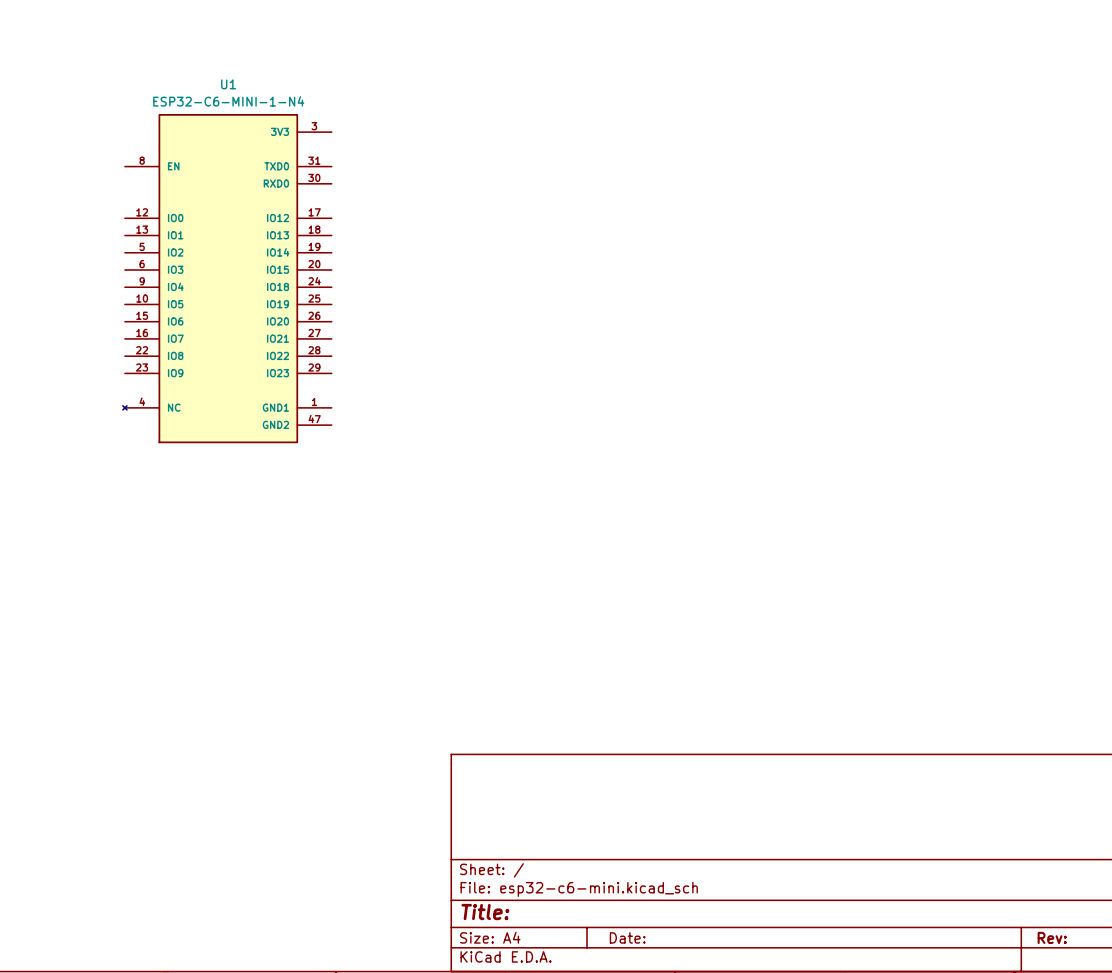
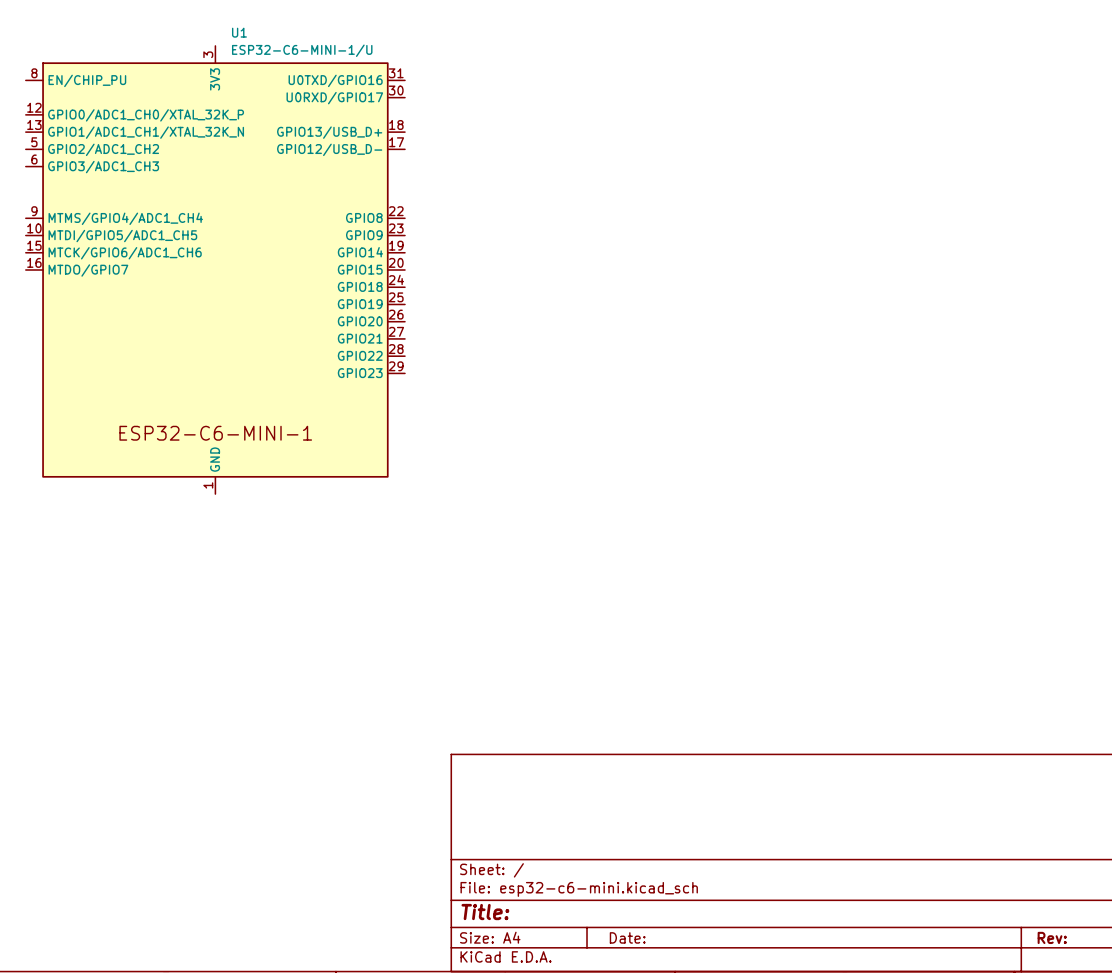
U1 name position: U1 (228, 84) -> U1 (239, 32)
U1 value: ESP32-C6-MINI-1-N4 (228, 101) -> ESP32-C6-MINI-1/U (302, 50)
U1 symbol: [122, 114, 332, 444] -> [25, 45, 406, 495]

